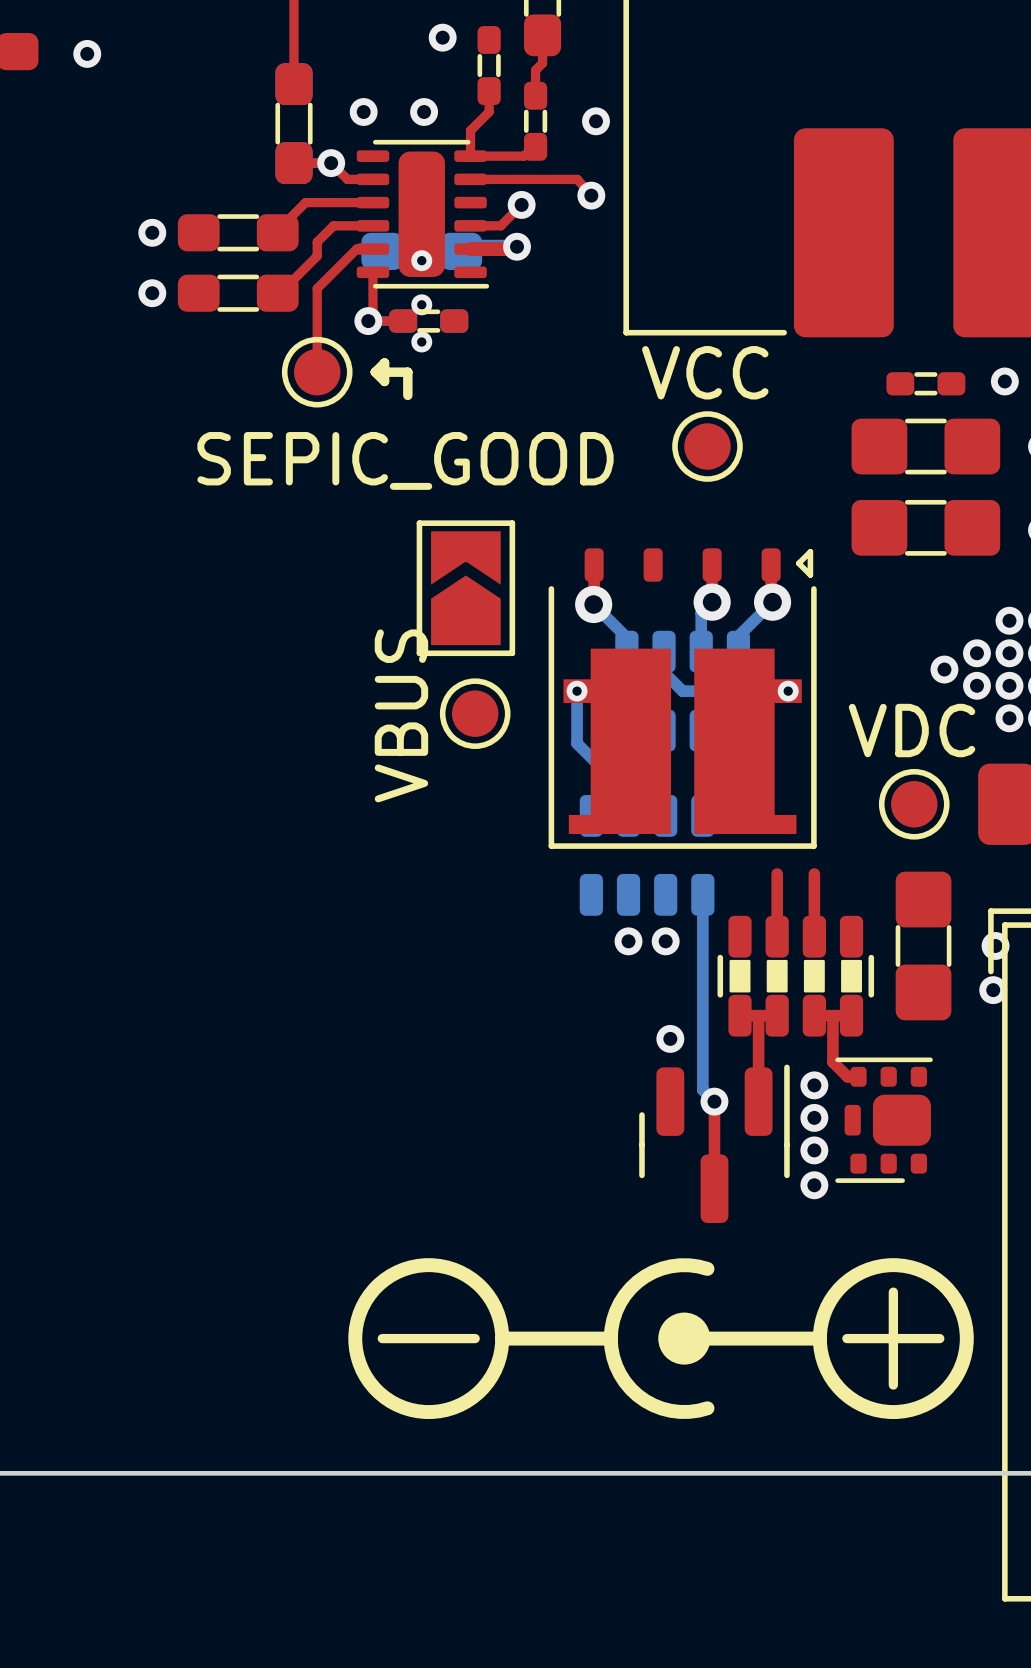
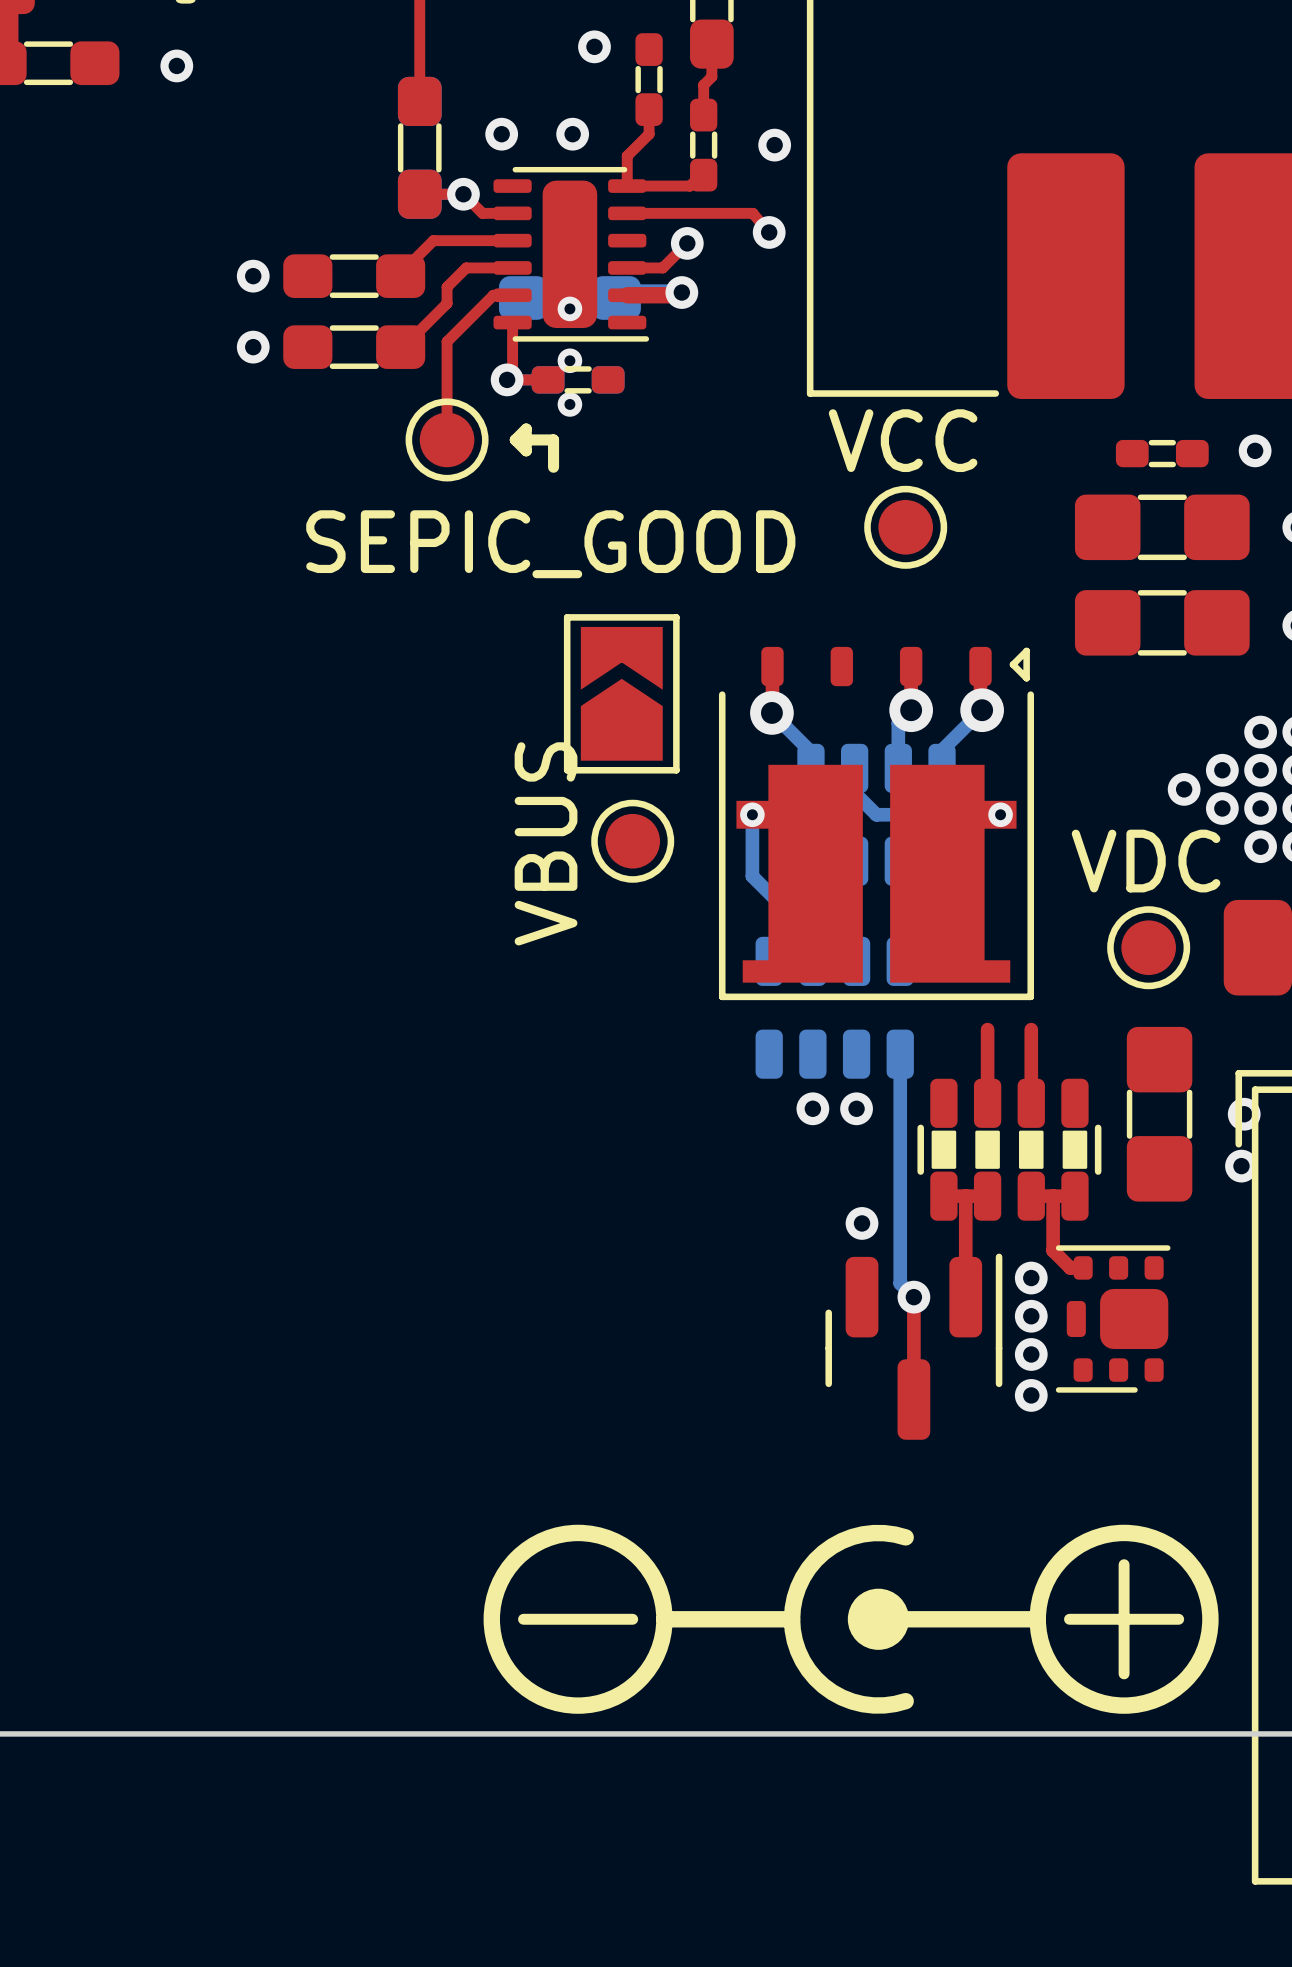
drawing position: (661, 1338) -> (851, 1619)

